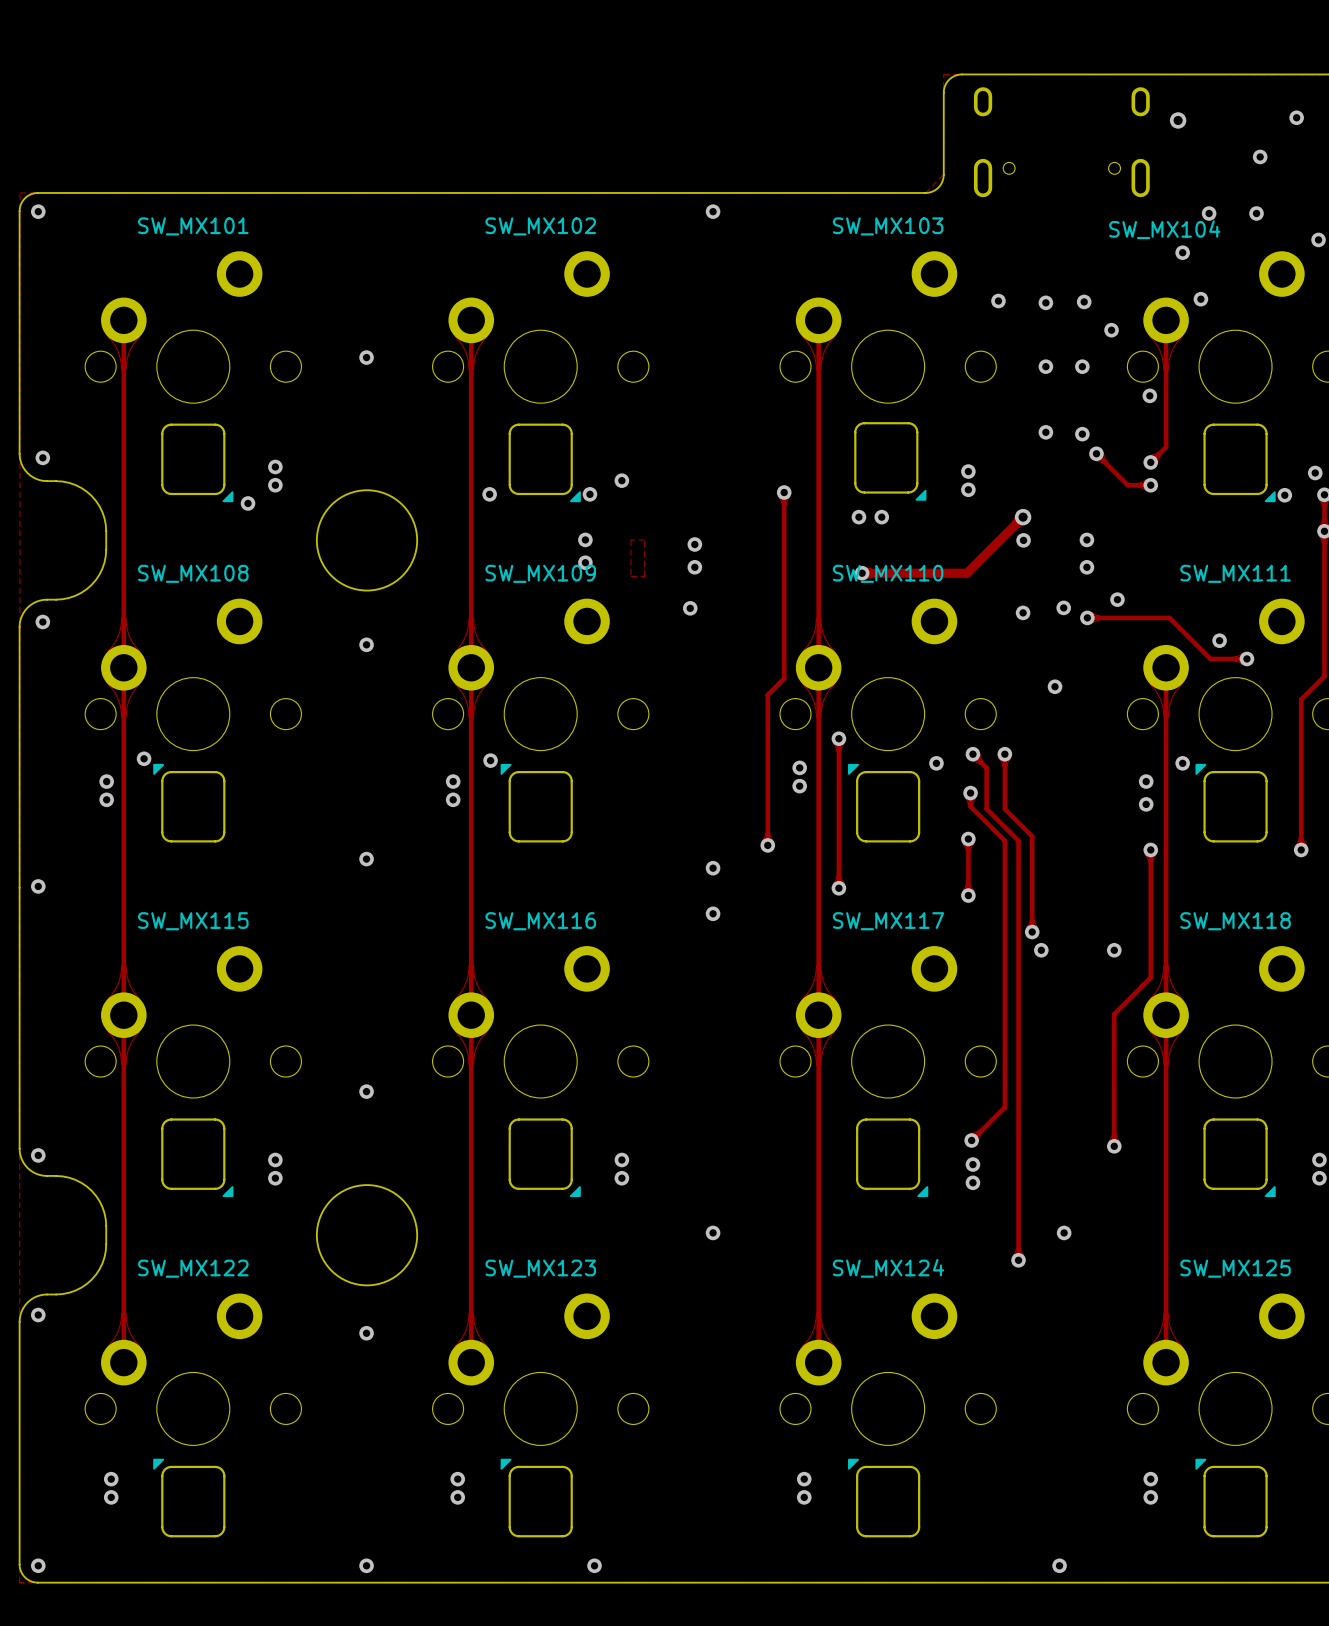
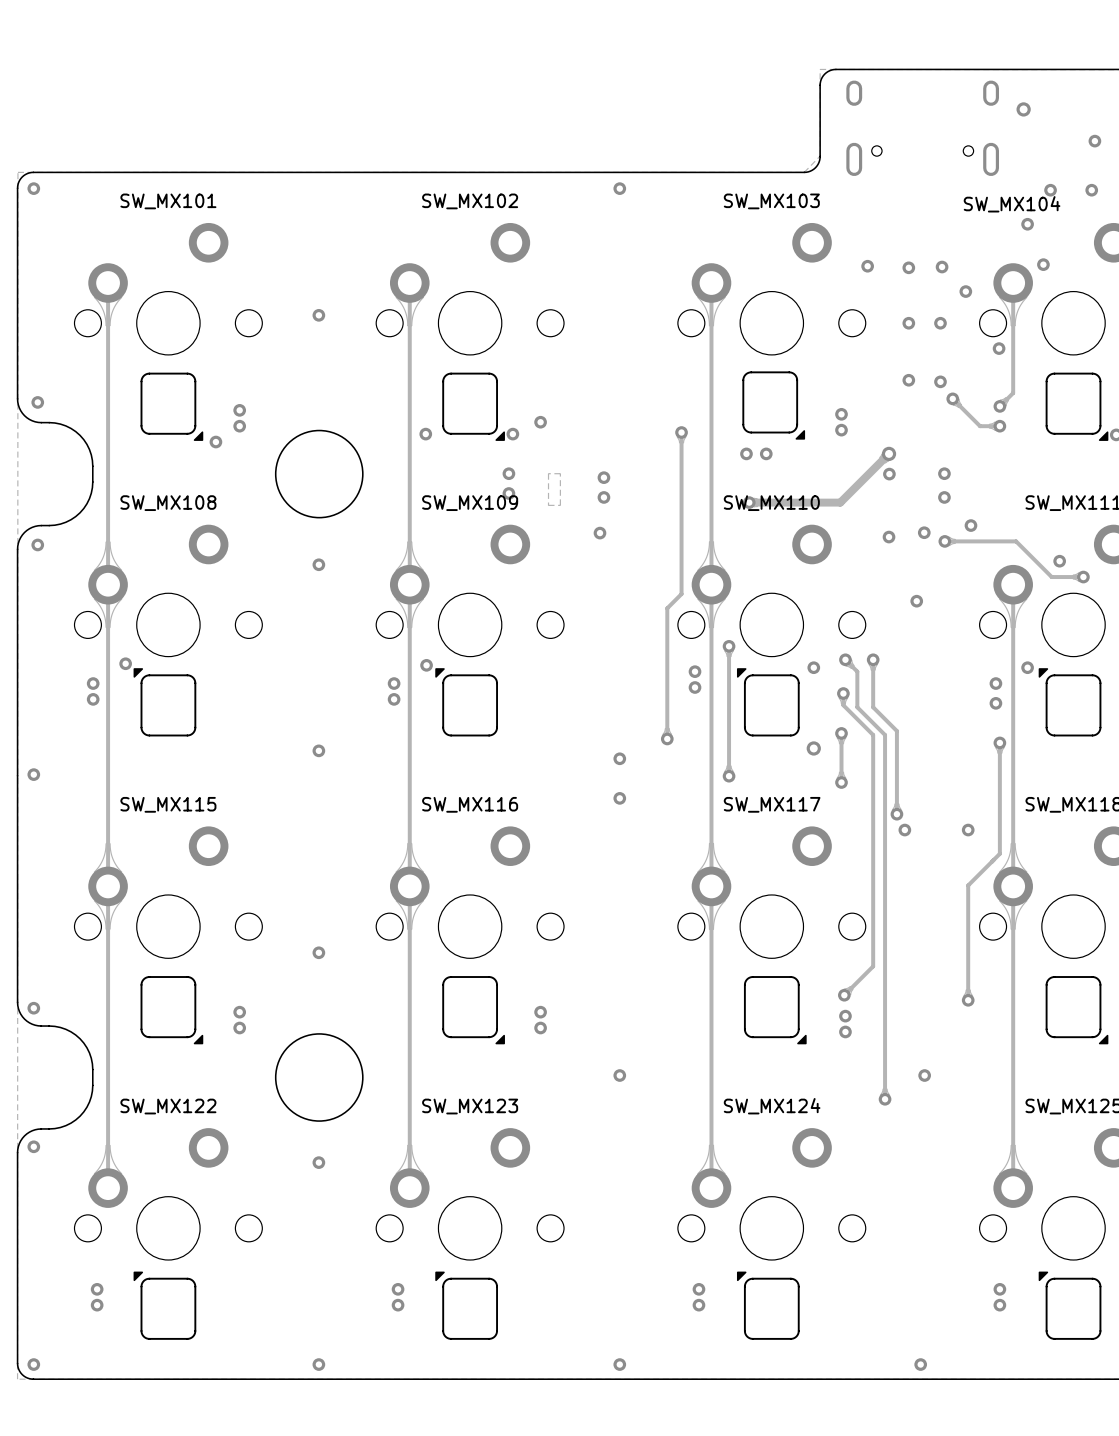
via: none -> (813, 748)
via: (594, 1565) -> none
via: none -> (619, 1364)

